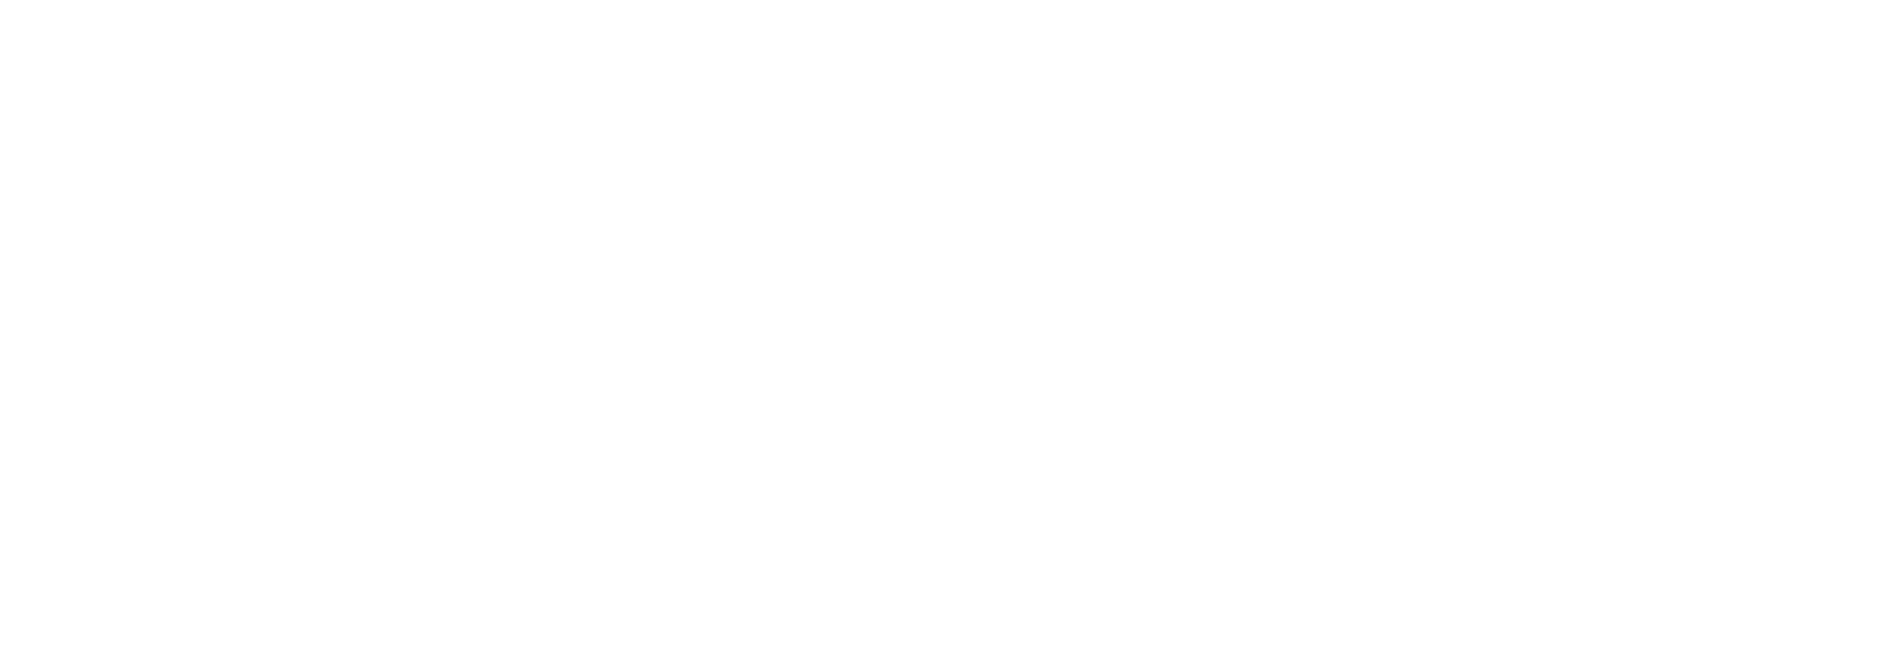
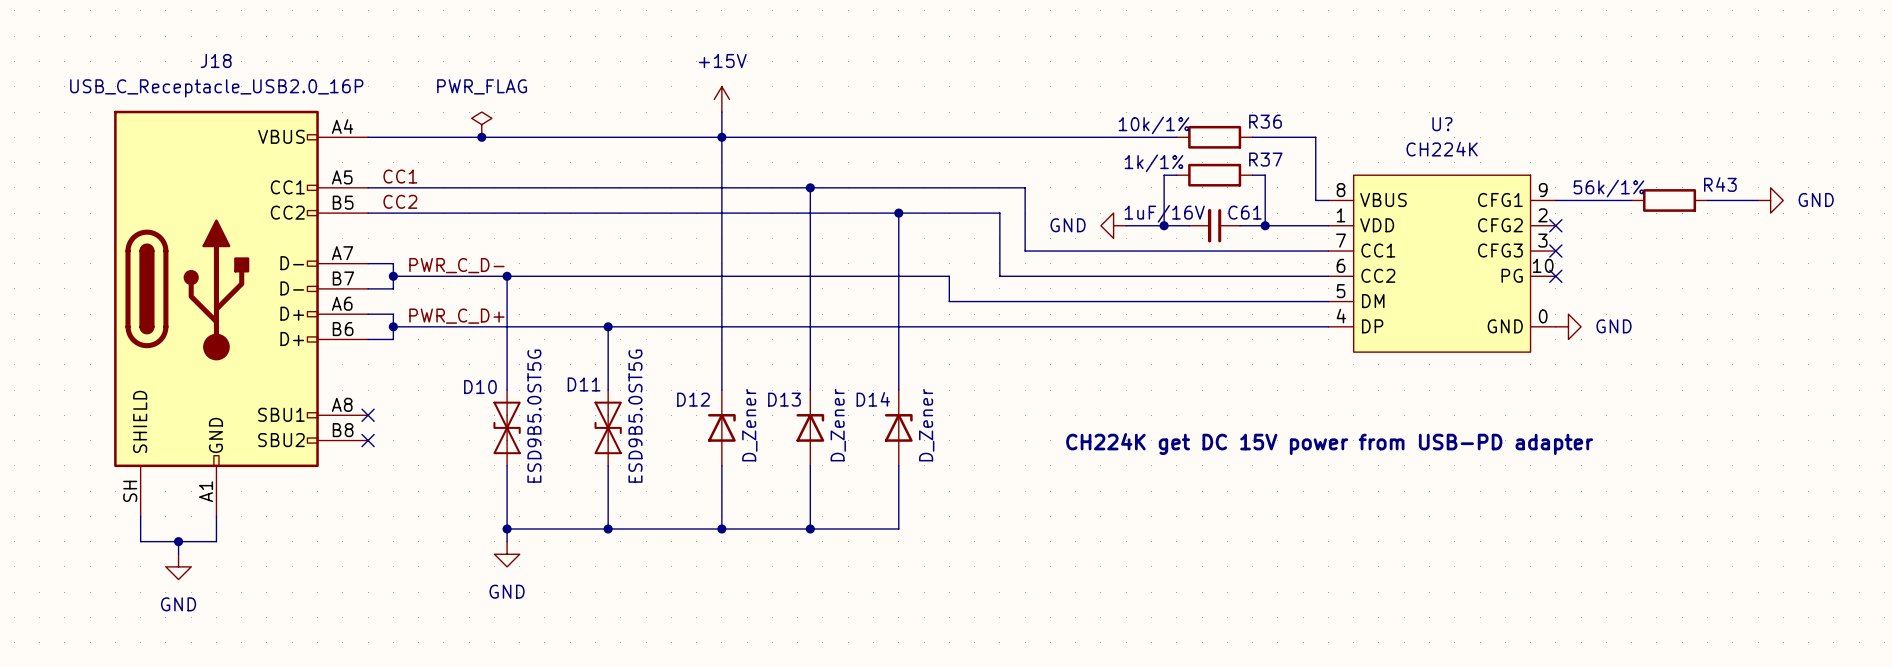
power symbol: none -> +15V (721, 99)
wire: none -> (721, 112) (721, 390)
power symbol: none -> PWR_FLAG (481, 124)
wire: none -> (368, 137) (1176, 137)
junction: none -> (481, 137)
junction: none -> (721, 137)
R36: none -> 10k/1% (1214, 137)
wire: none -> (1252, 137) (1315, 137) (1315, 200) (1328, 200)
wire: none -> (1176, 175) (1164, 175) (1164, 225)
R37: none -> 1k/1% (1214, 175)
wire: none -> (1252, 175) (1265, 175) (1265, 225)
label: none -> CC1 (400, 176)
wire: none -> (368, 187) (1025, 187) (1025, 251) (1328, 251)
wire: none -> (810, 187) (810, 390)
junction: none -> (810, 187)
wire: none -> (1555, 200) (1631, 200)
R43: none -> 56k/1% (1669, 200)
wire: none -> (1707, 200) (1758, 200)
power symbol: none -> GND (1770, 200)
label: none -> CC2 (400, 201)
wire: none -> (368, 213) (999, 213) (999, 276) (1328, 276)
wire: none -> (898, 213) (898, 390)
junction: none -> (898, 213)
power symbol: none -> GND (1113, 225)
wire: none -> (1126, 225) (1189, 225)
junction: none -> (1164, 225)
C61: none -> 1uF/16V (1214, 225)
wire: none -> (1239, 225) (1328, 225)
junction: none -> (1265, 225)
no-connect mark: none -> (1555, 225)
no-connect mark: none -> (1555, 251)
wire: none -> (368, 263) (393, 263) (393, 288) (368, 288)
U?: none -> (1442, 263)
label: none -> PWR_C_D- (456, 265)
wire: none -> (393, 276) (949, 276) (949, 301) (1328, 301)
junction: none -> (393, 276)
wire: none -> (507, 276) (507, 390)
junction: none -> (507, 276)
no-connect mark: none -> (1555, 276)
J18: none -> USB_C_Receptacle_USB2.0_16P (241, 313)
wire: none -> (368, 314) (393, 314) (393, 339) (368, 339)
label: none -> PWR_C_D+ (456, 316)
wire: none -> (393, 326) (1328, 326)
junction: none -> (393, 326)
wire: none -> (608, 326) (608, 390)
junction: none -> (608, 326)
power symbol: none -> GND (1568, 326)
no-connect mark: none -> (368, 415)
D10: none -> ESD9B5.0ST5G (507, 427)
D11: none -> ESD9B5.0ST5G (608, 427)
D12: none -> D_Zener (721, 427)
D13: none -> D_Zener (810, 427)
D14: none -> D_Zener (898, 427)
no-connect mark: none -> (368, 440)
text: none -> CH224K get DC 15V power from USB-PD adapter (1329, 444)
wire: none -> (507, 465) (507, 541)
wire: none -> (608, 465) (608, 528)
wire: none -> (721, 465) (721, 528)
wire: none -> (810, 465) (810, 528)
wire: none -> (898, 465) (898, 528) (507, 528)
wire: none -> (140, 516) (140, 541) (216, 541) (216, 516)
junction: none -> (507, 528)
junction: none -> (608, 528)
junction: none -> (721, 528)
junction: none -> (810, 528)
wire: none -> (178, 541) (178, 554)
junction: none -> (178, 541)
power symbol: none -> GND (507, 554)
power symbol: none -> GND (178, 566)

